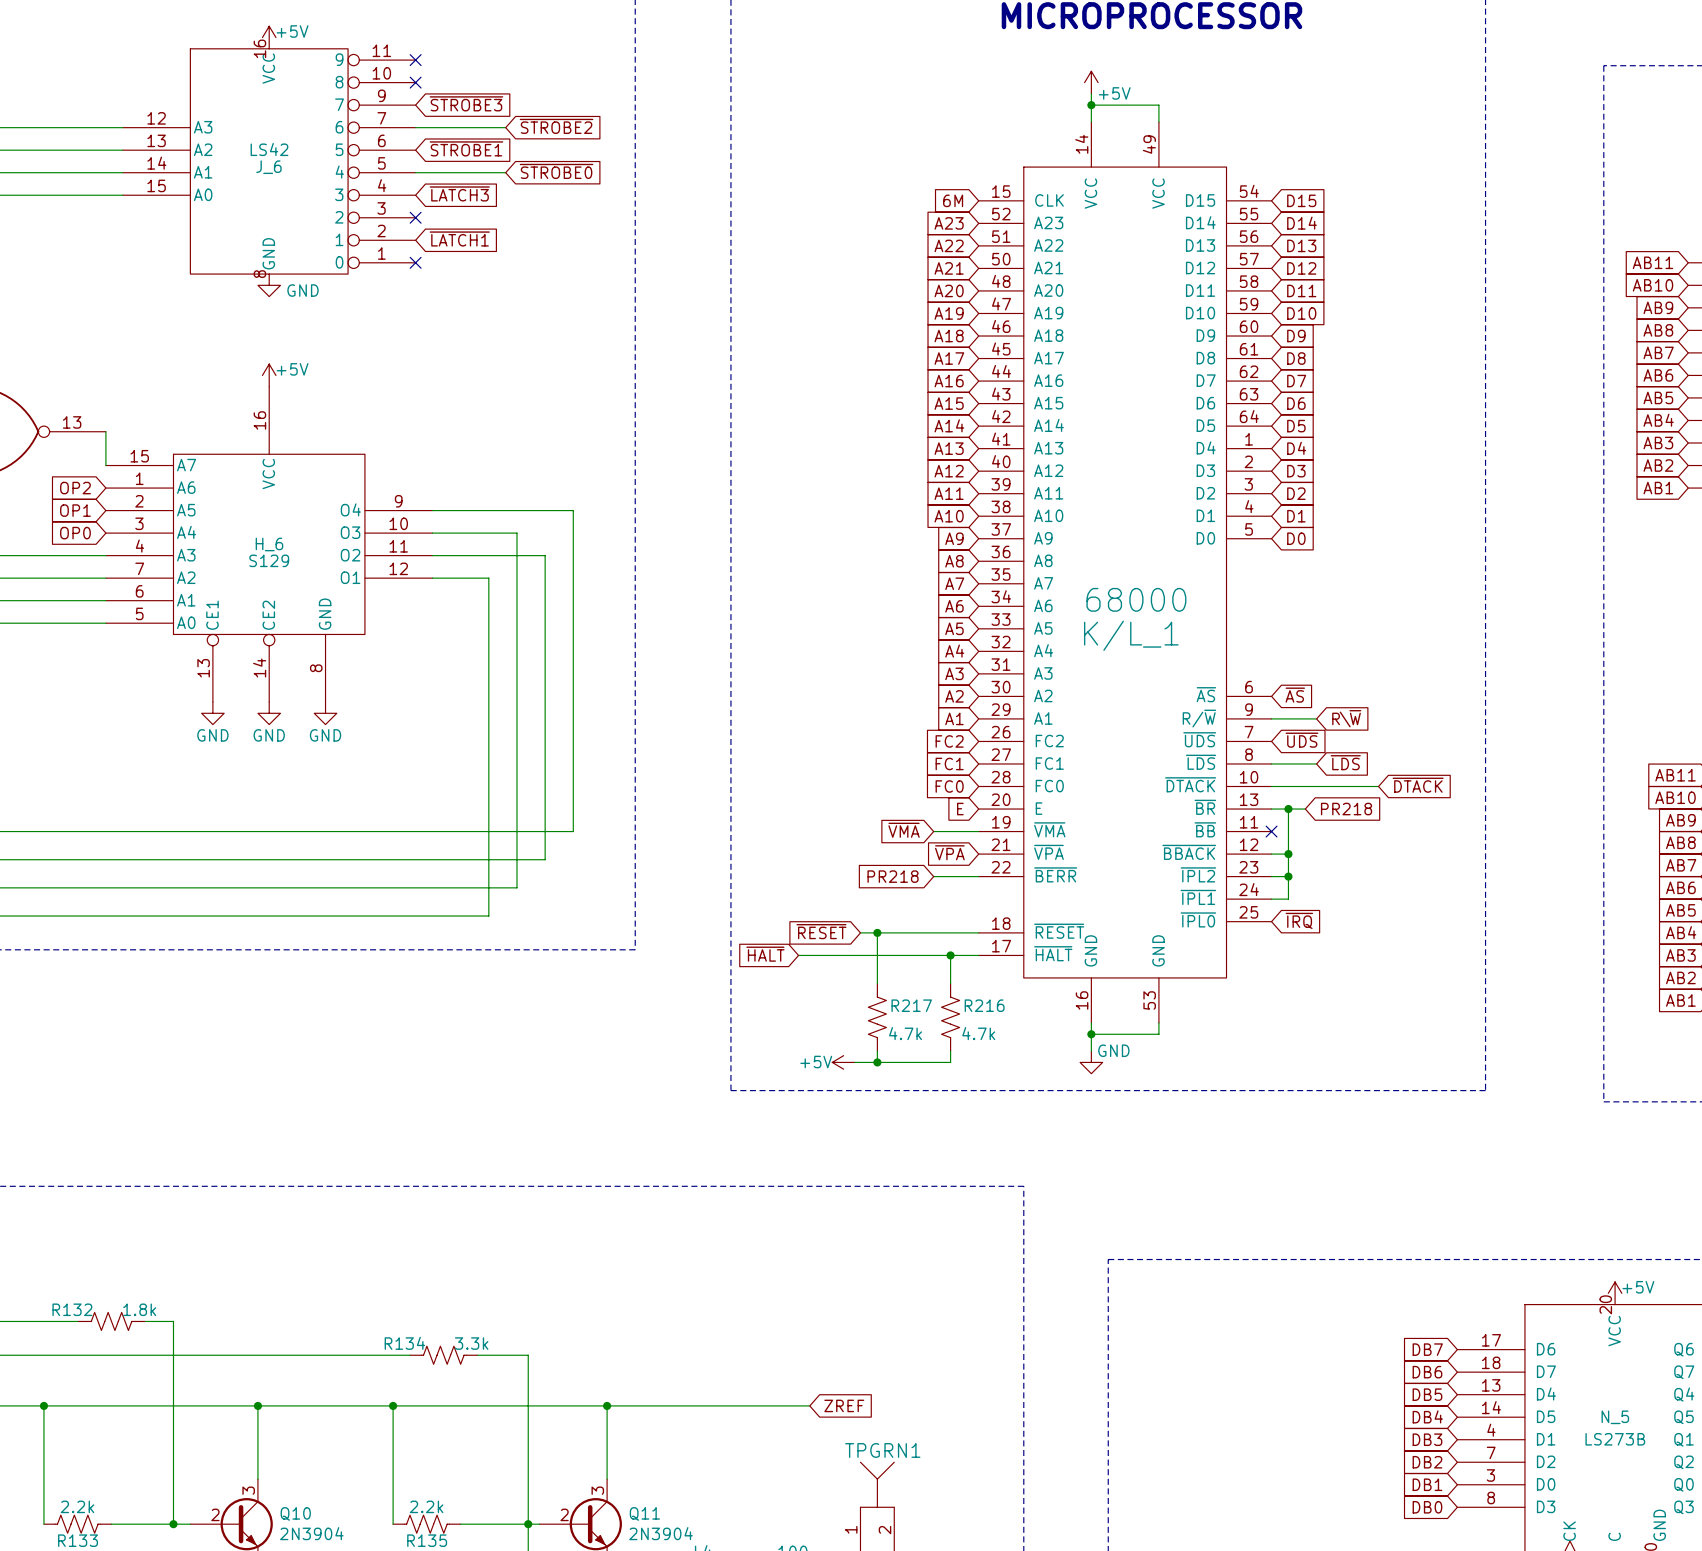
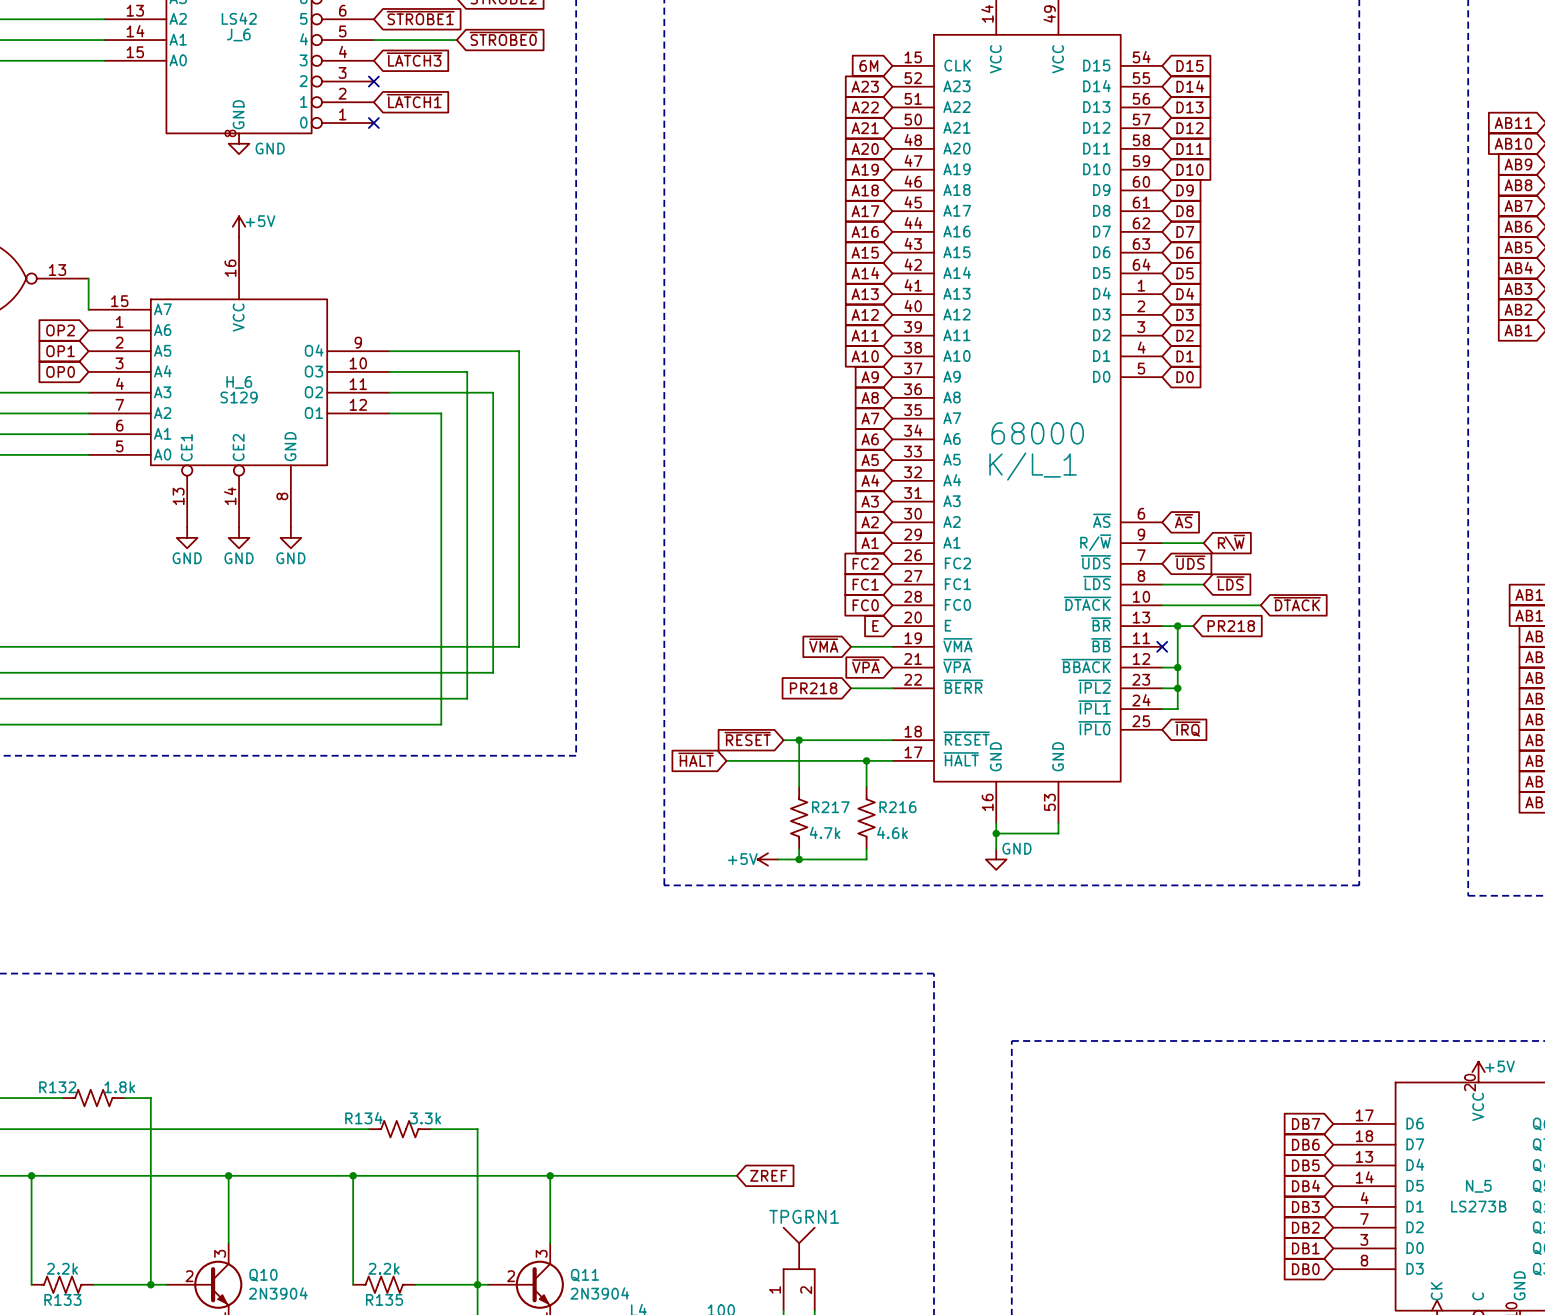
R216 value: 4.7k (978, 1033) -> 4.6k (892, 832)

